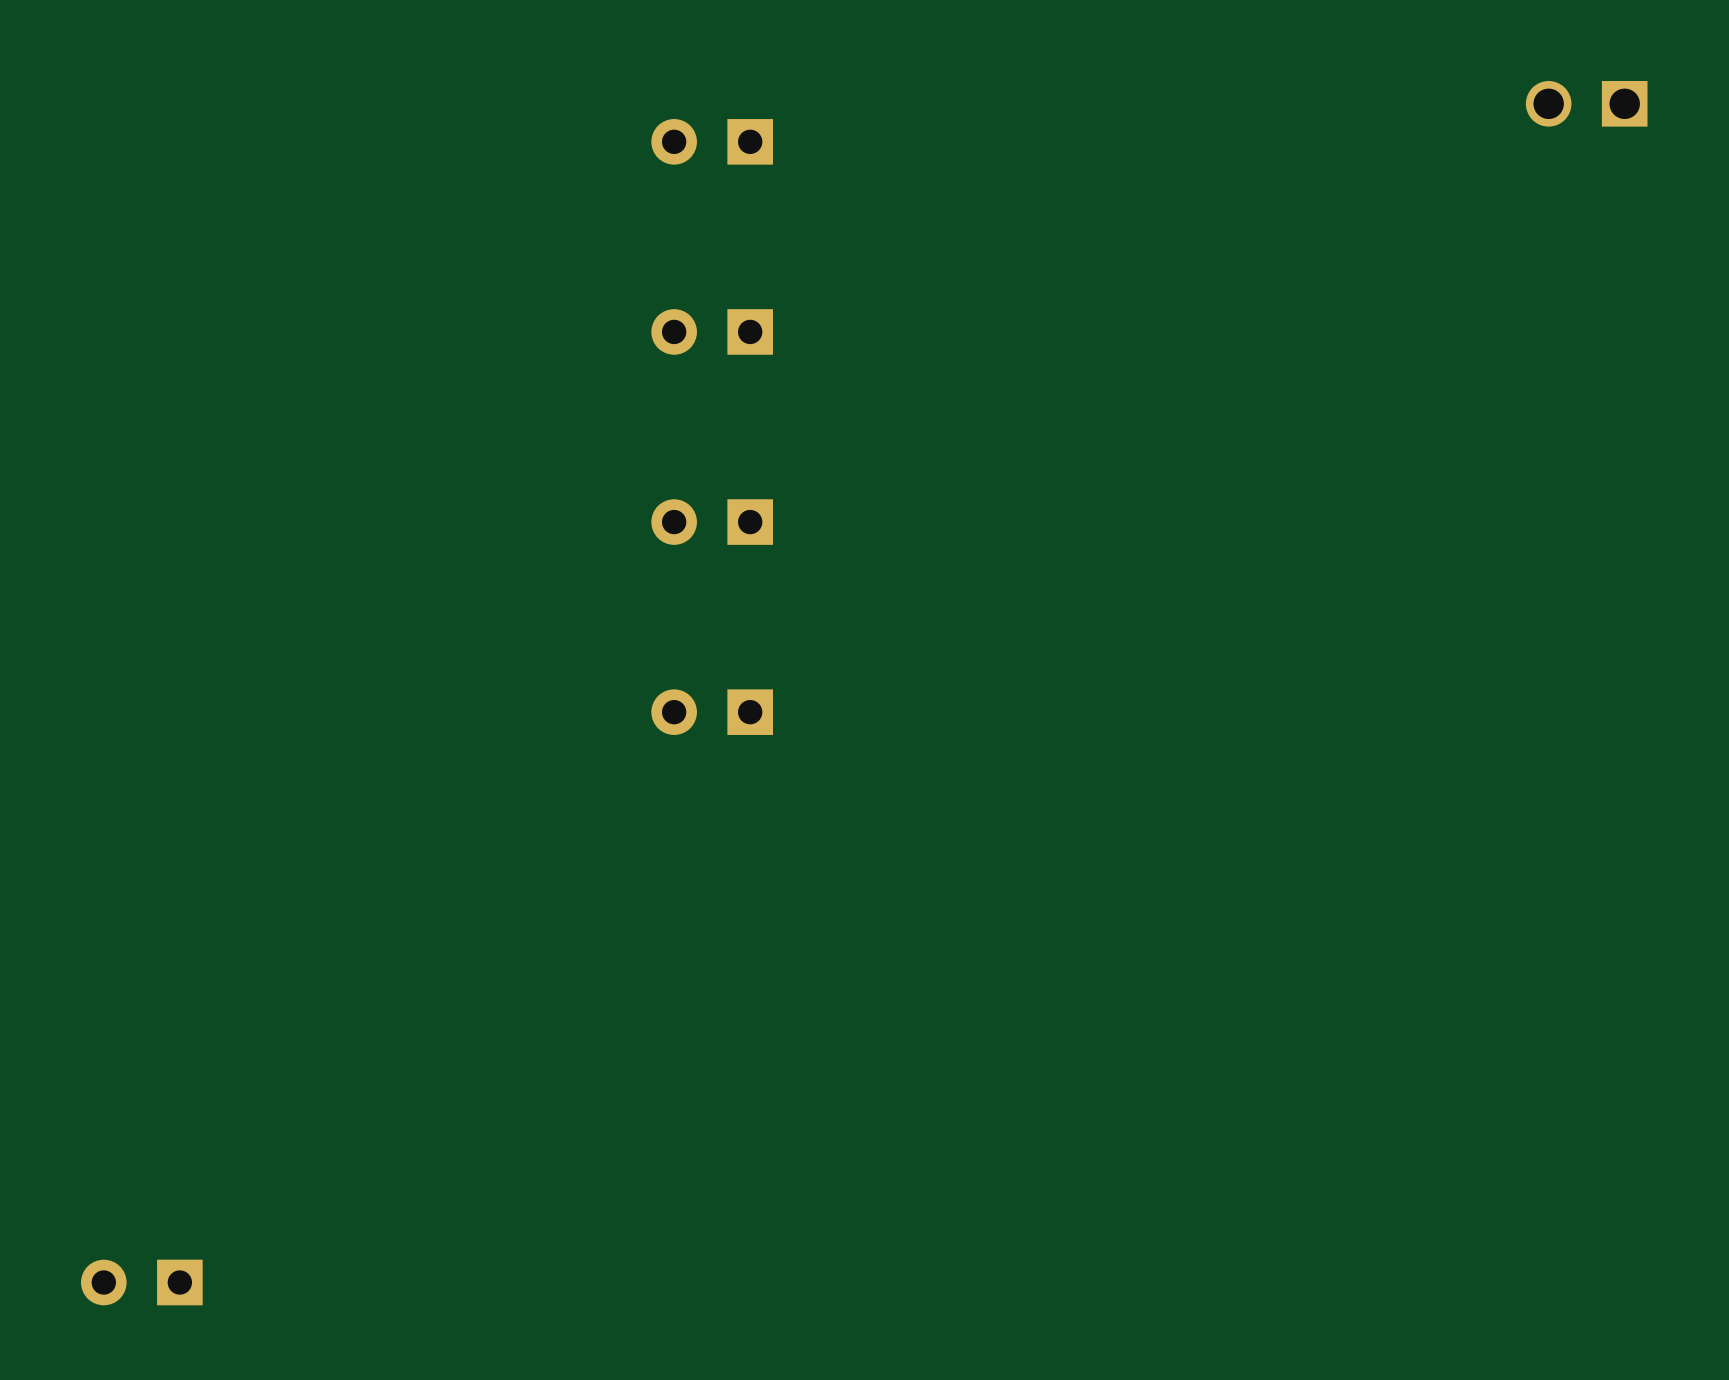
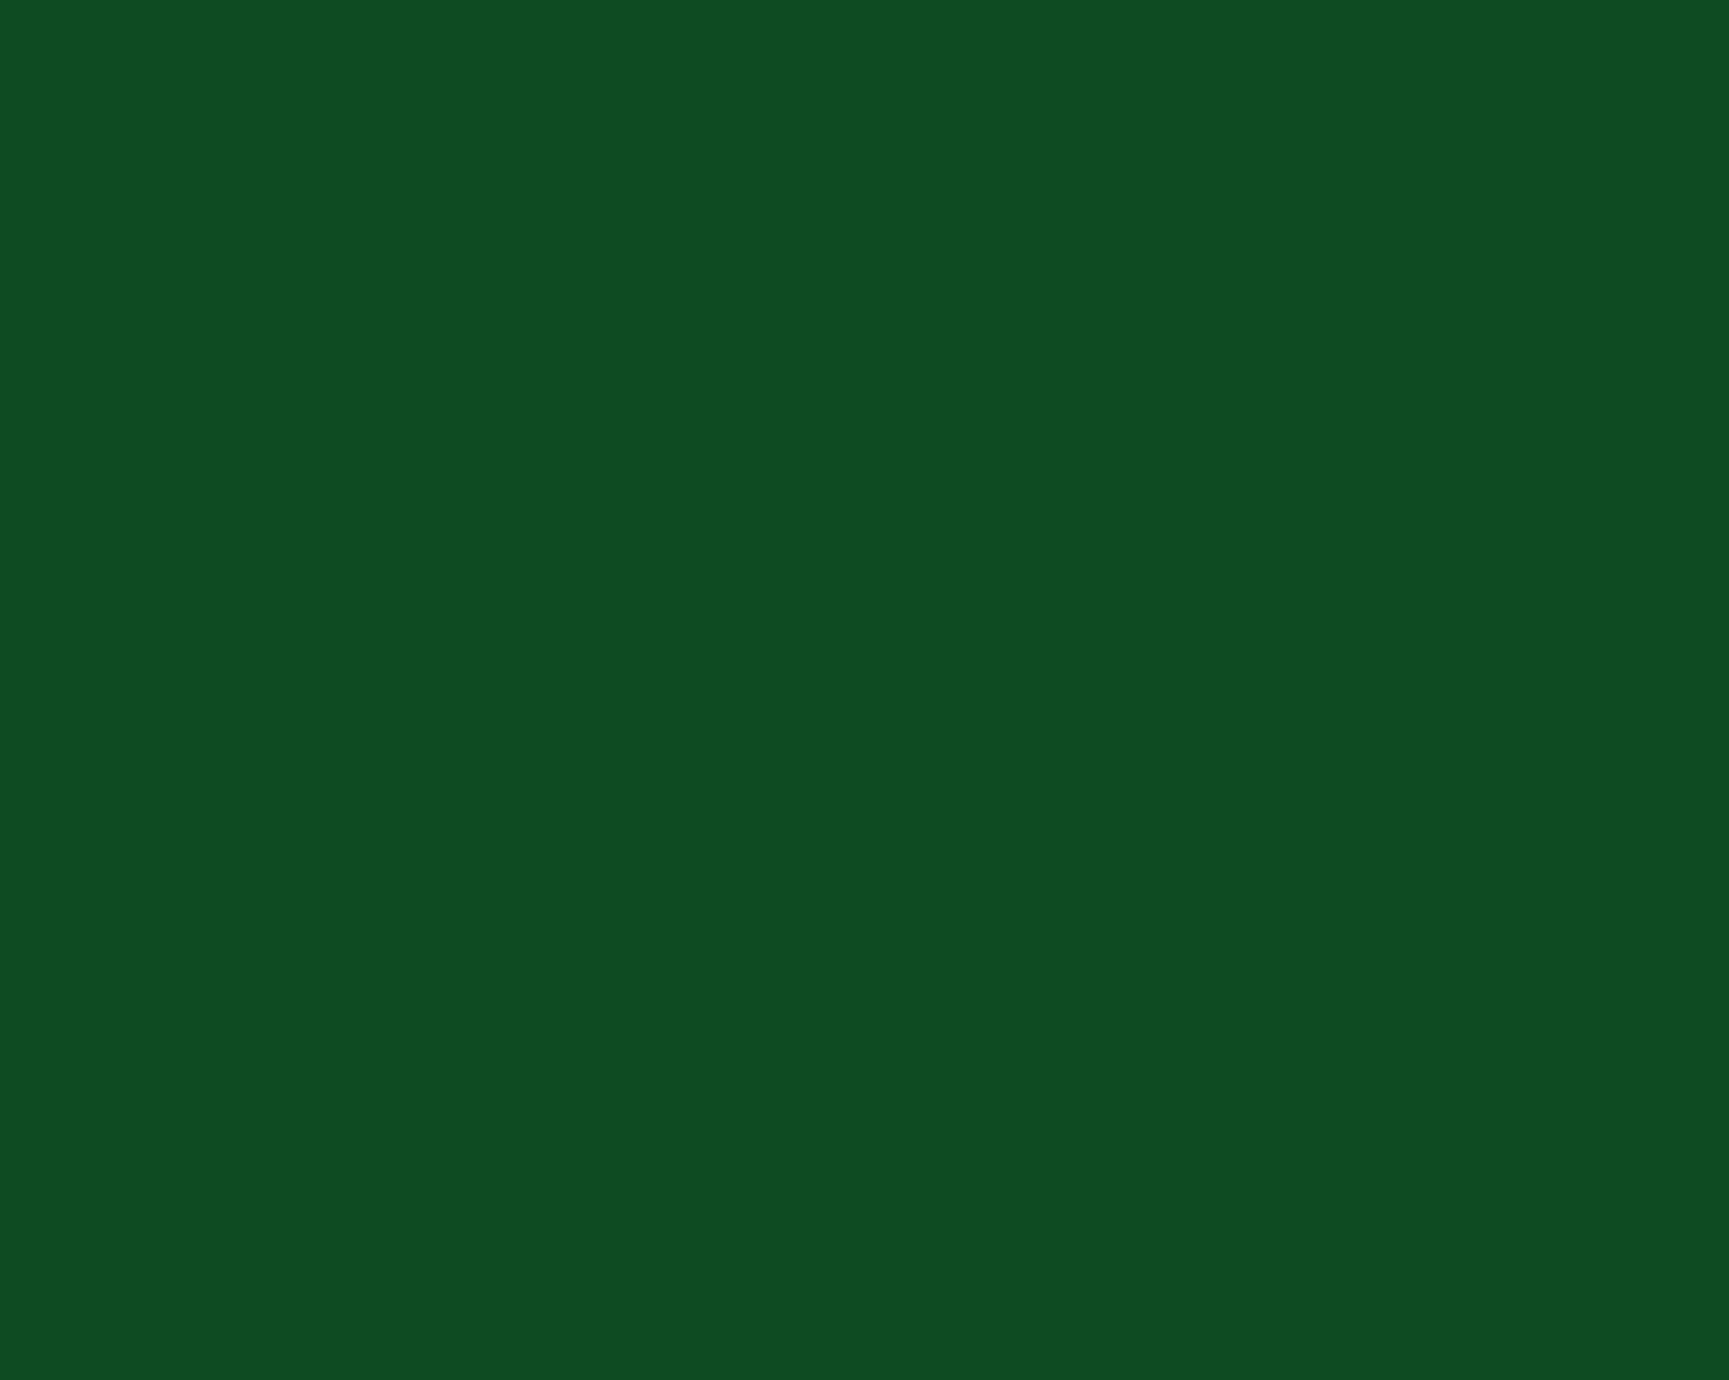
part: (1586, 103) -> none
part: (712, 141) -> none
part: (712, 331) -> none
part: (712, 522) -> none
part: (712, 712) -> none
part: (141, 1282) -> none

